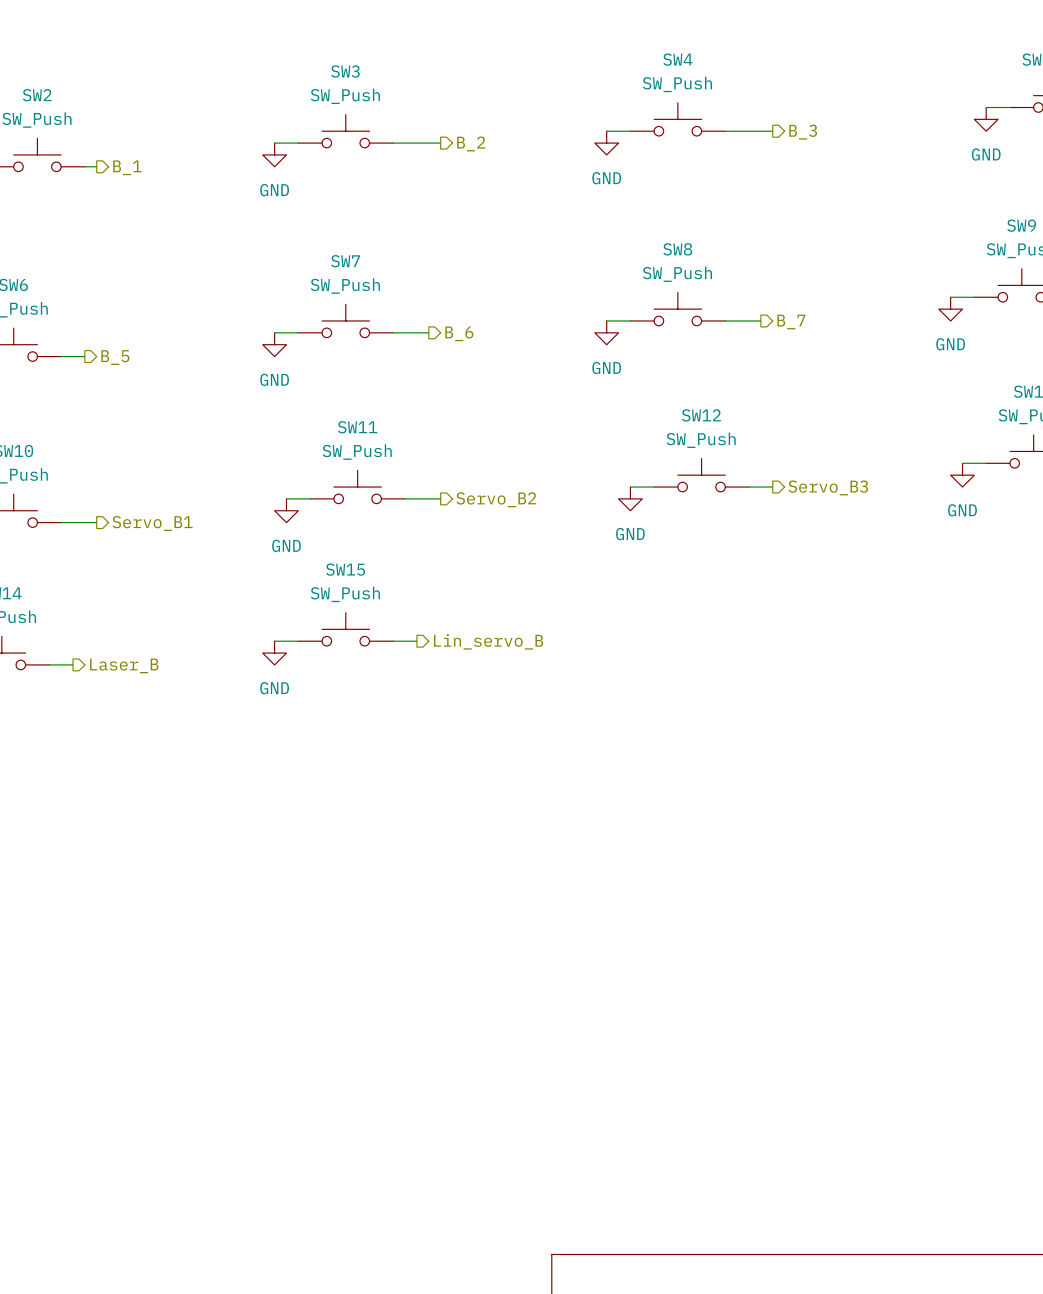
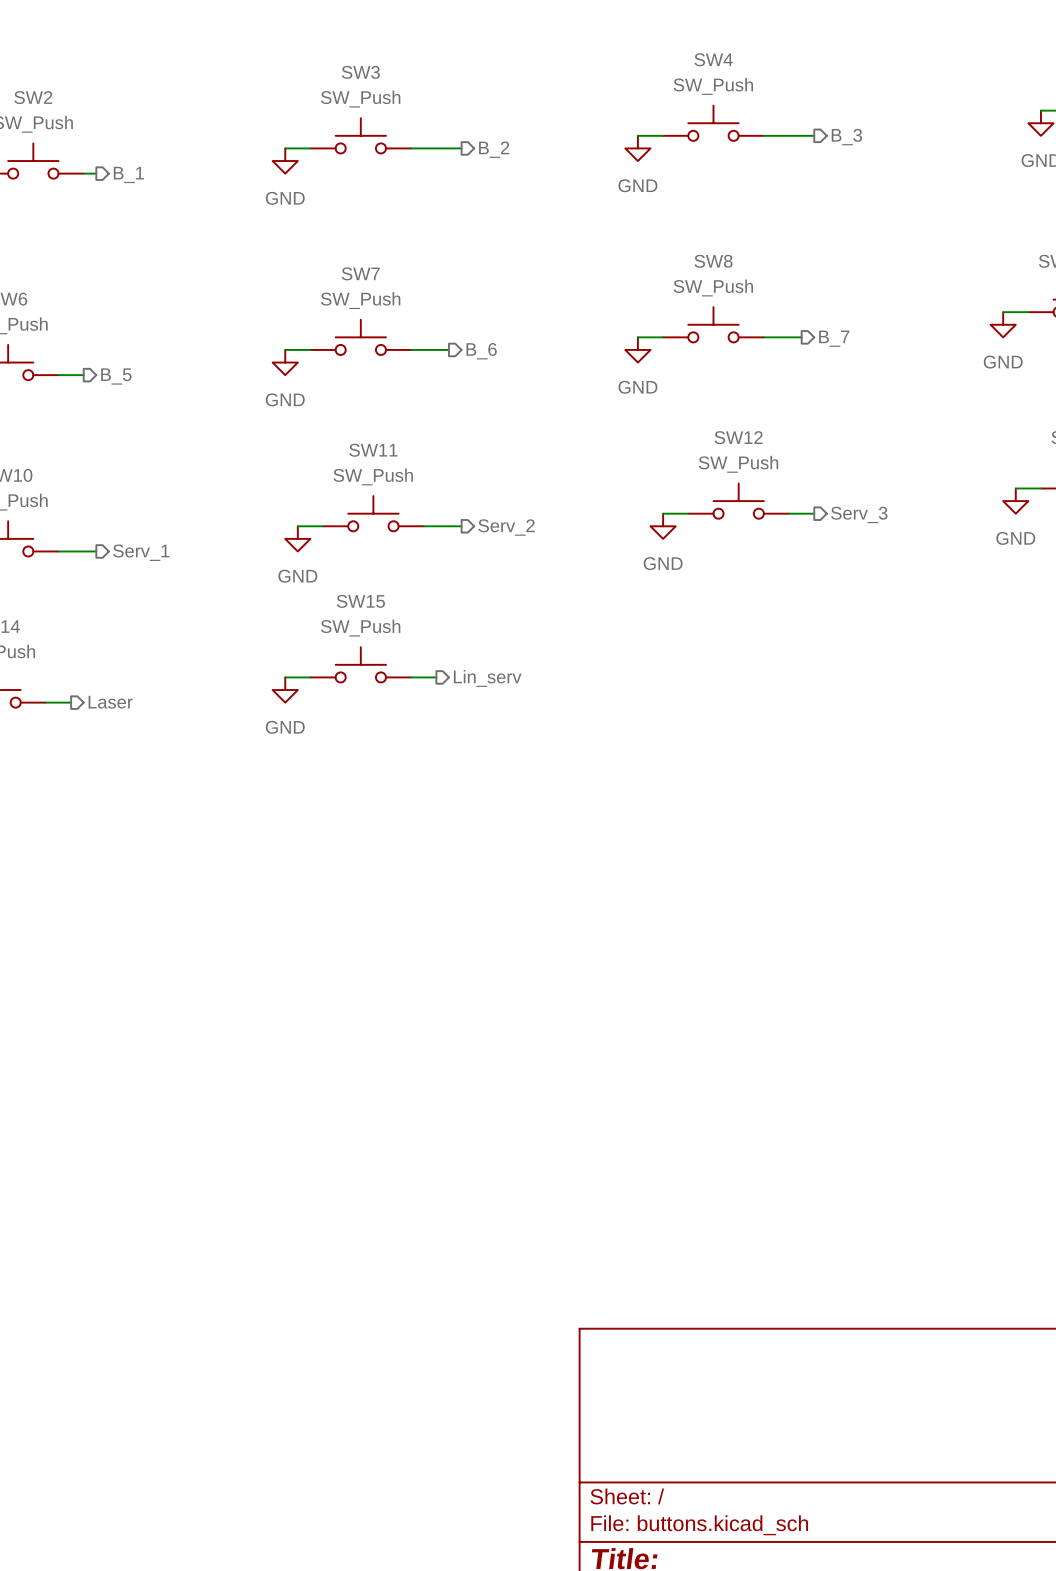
hierarchical label: Servo_B3 (828, 487) -> Serv_3 (859, 514)
hierarchical label: Servo_B2 (496, 499) -> Serv_2 (506, 527)
hierarchical label: Servo_B1 (152, 523) -> Serv_1 (141, 552)
hierarchical label: Lin_servo_B (488, 641) -> Lin_serv (487, 678)
hierarchical label: Laser_B (124, 665) -> Laser (110, 702)

